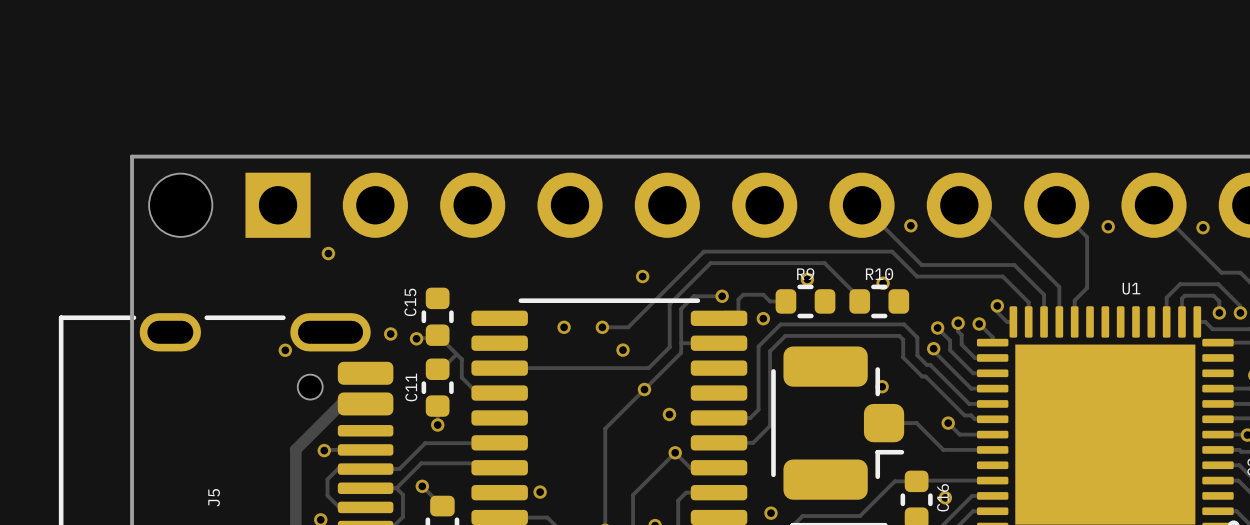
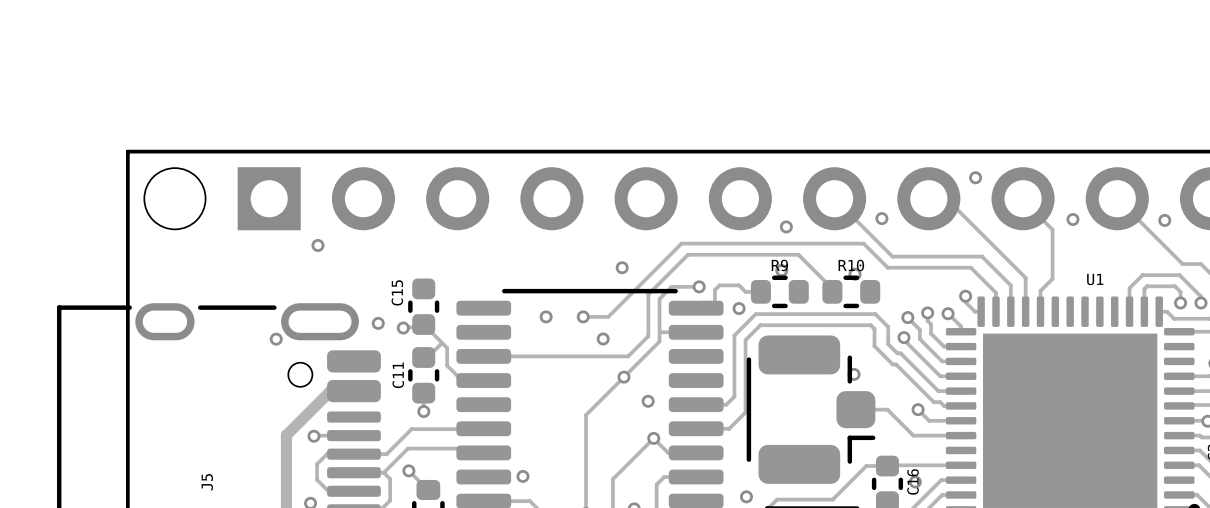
via: none -> (975, 177)
via: none -> (786, 226)

